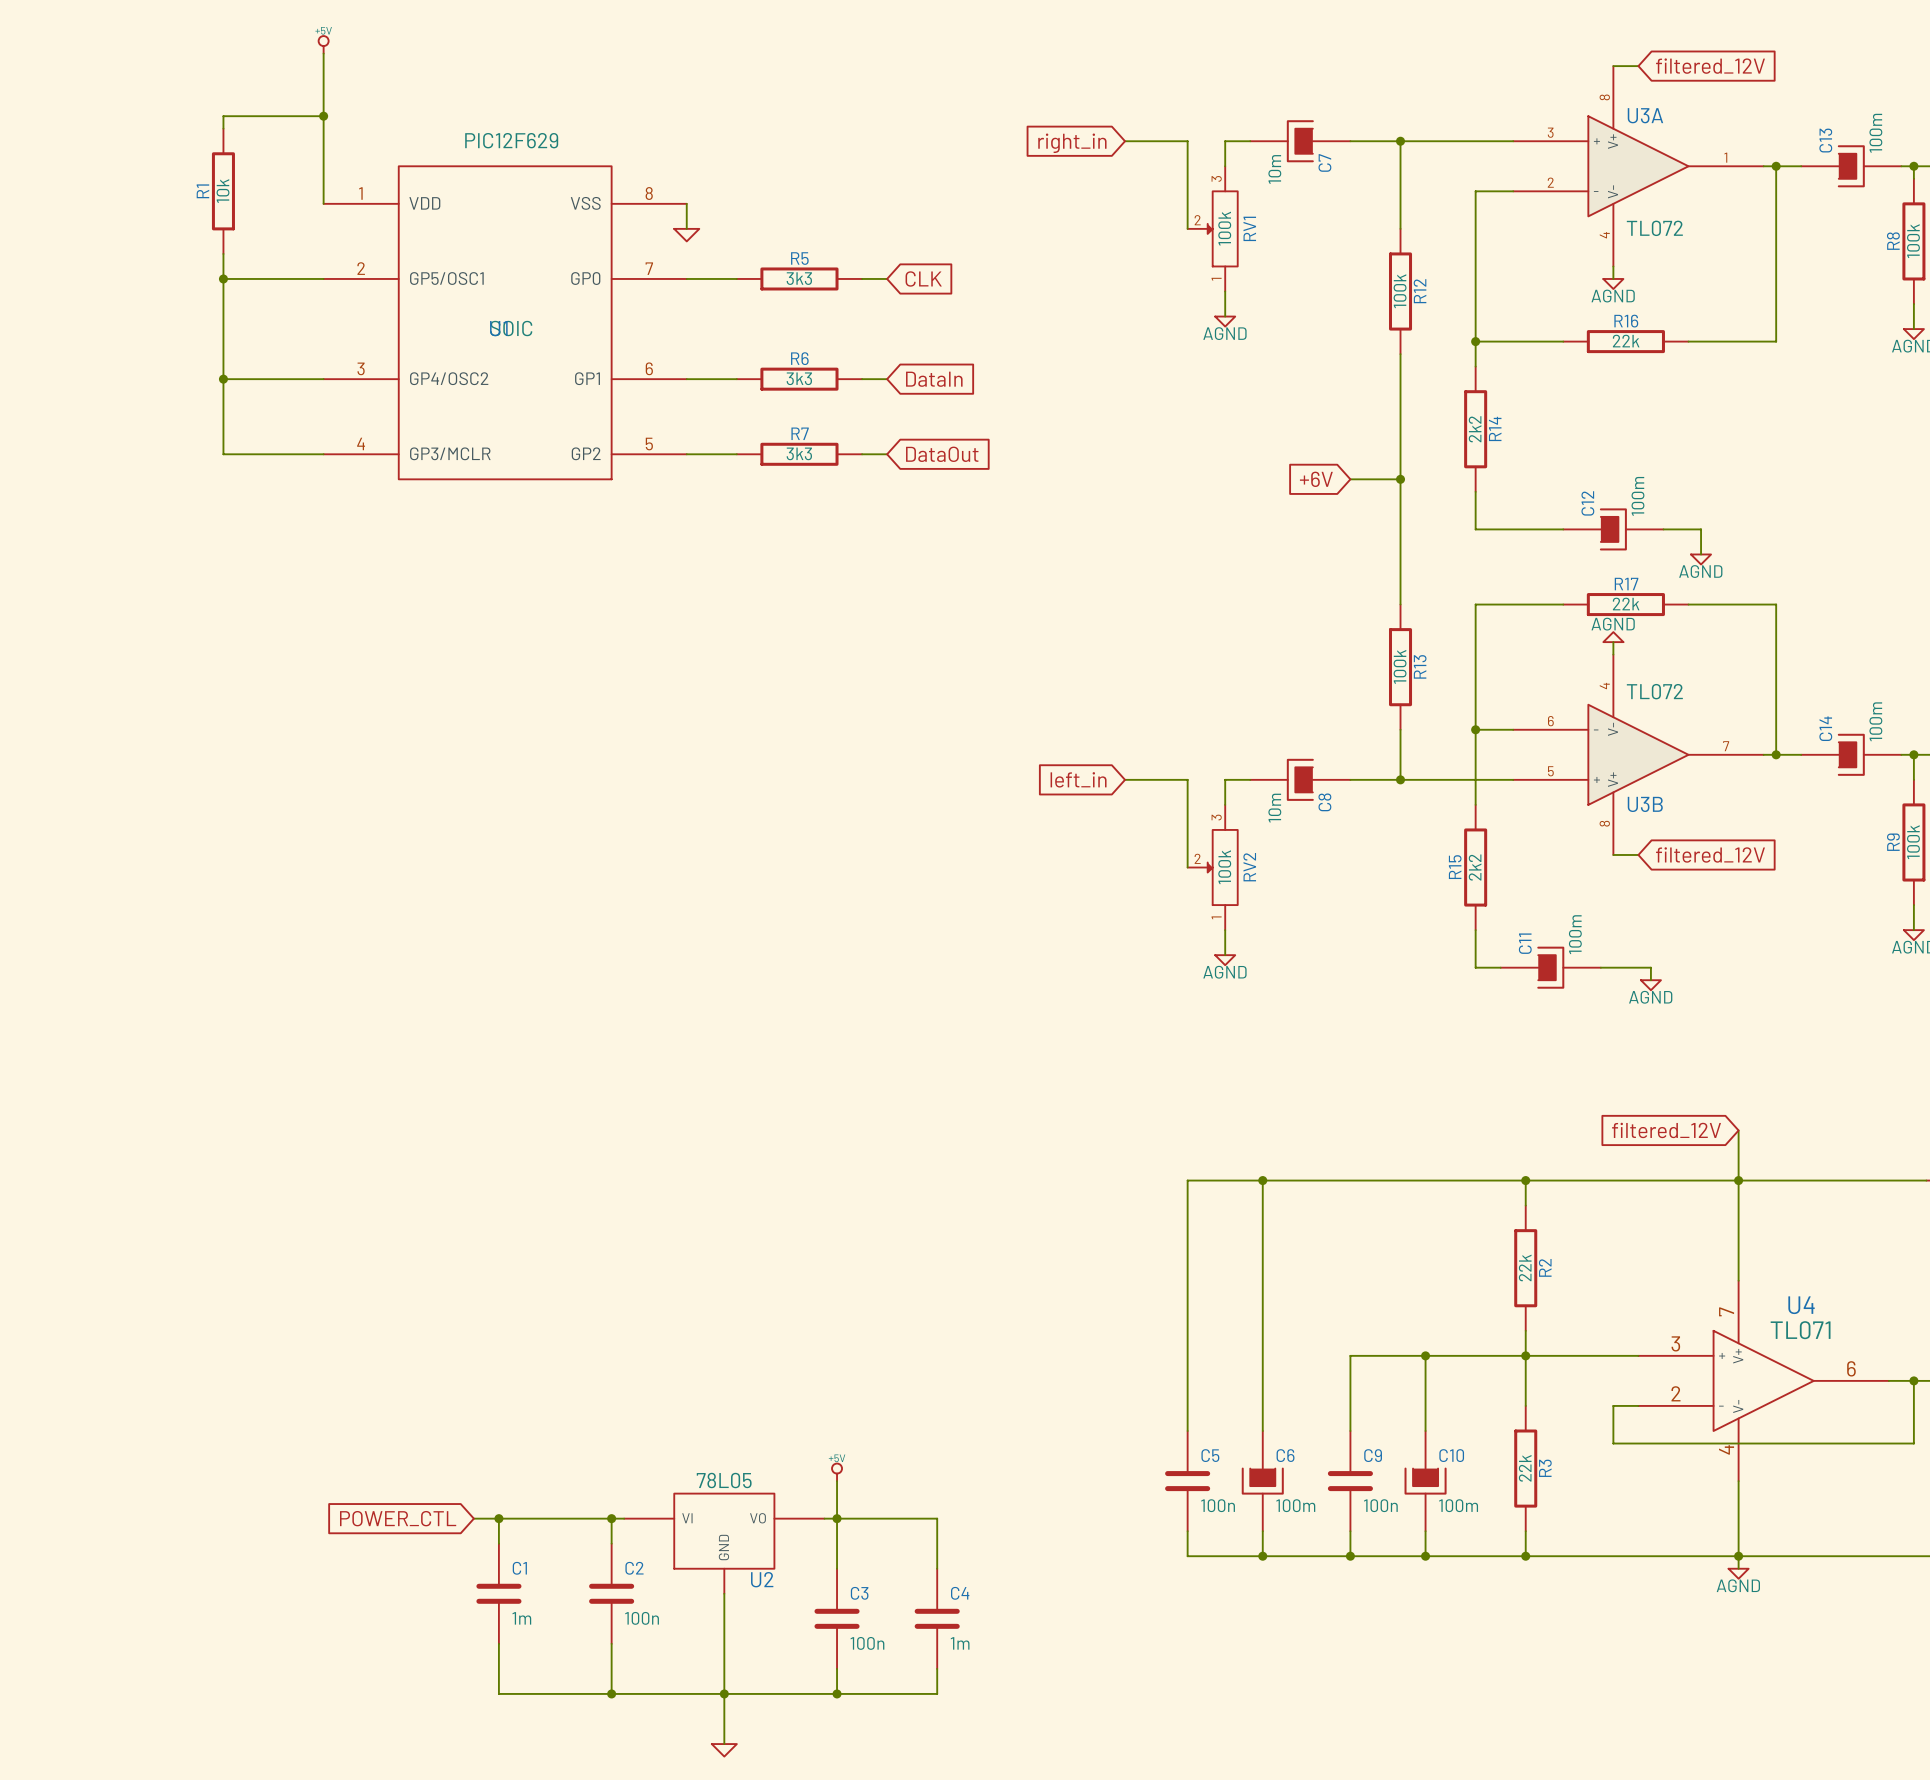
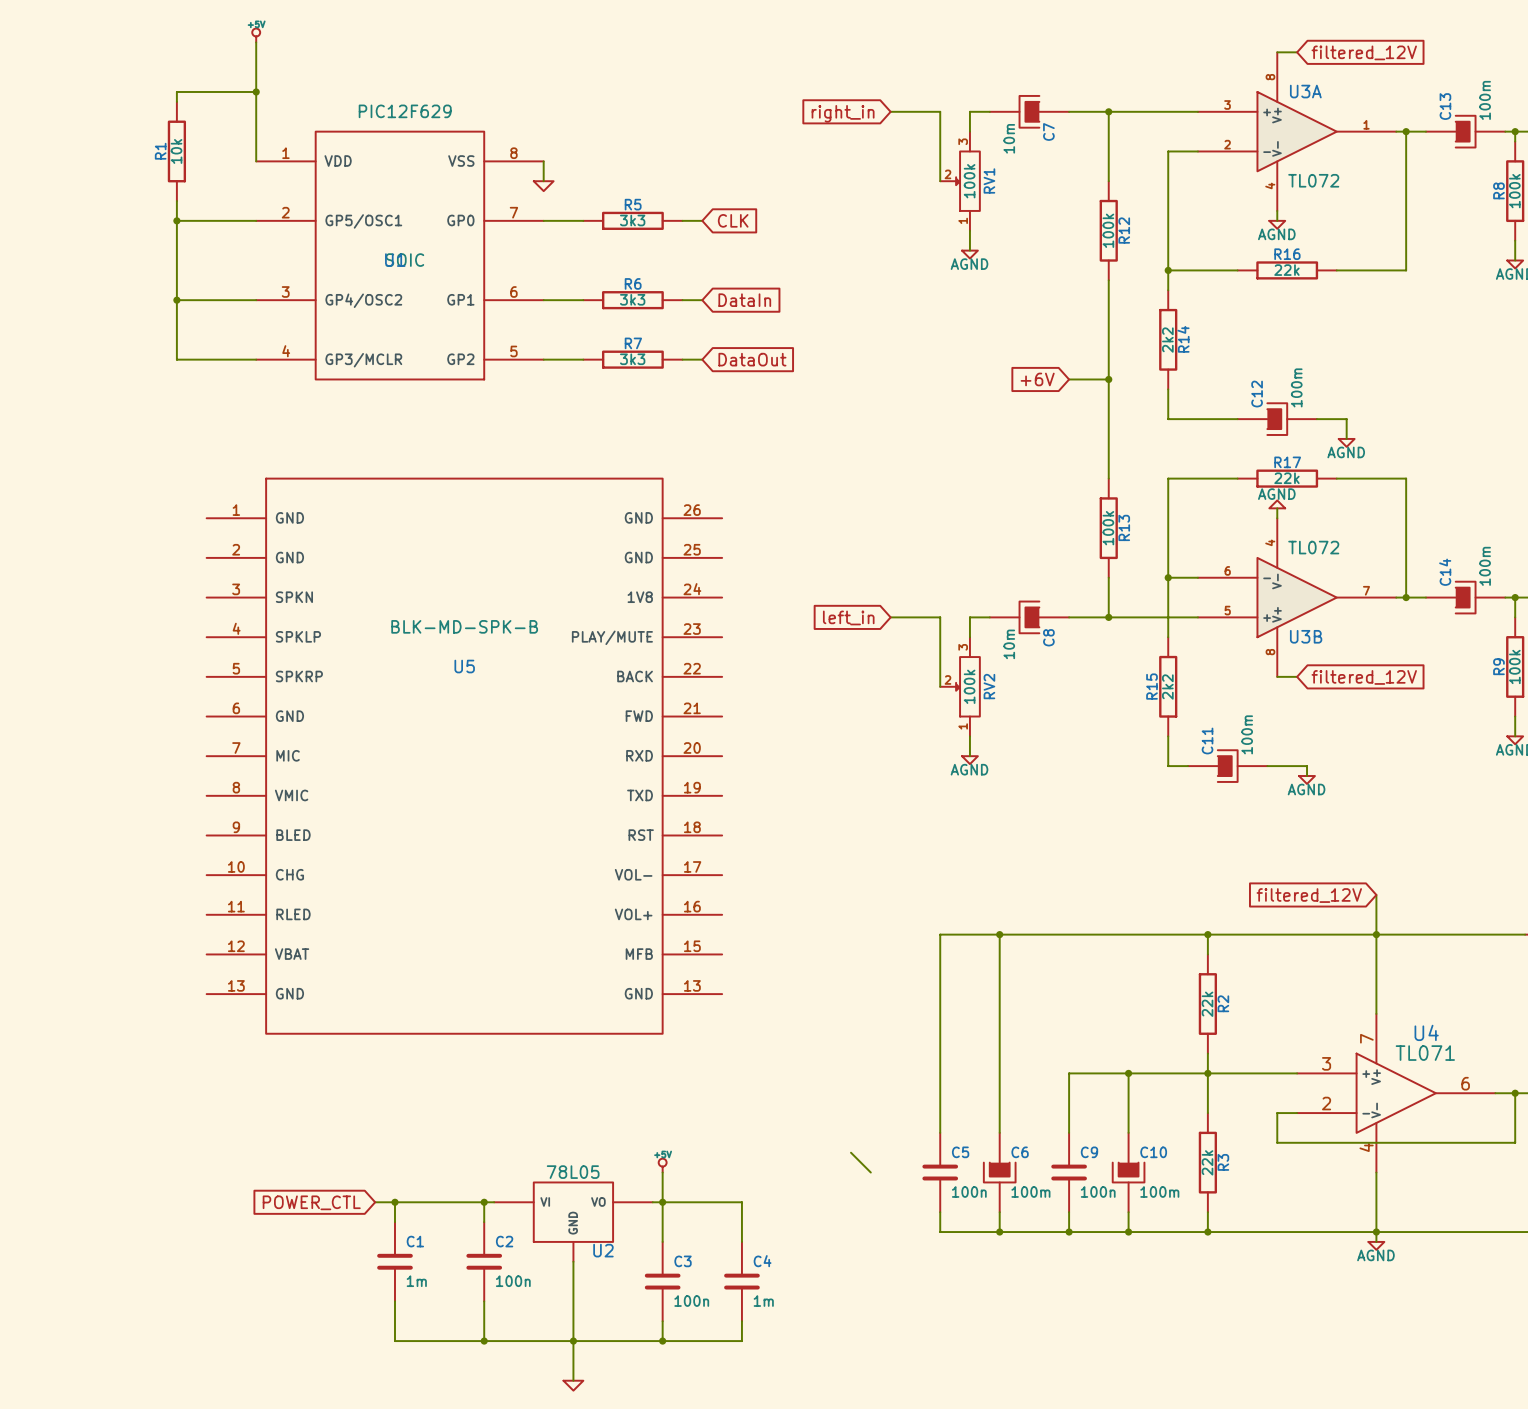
U5: none -> BLK-MD-SPK-B (464, 756)
wire: none -> (851, 1152) (870, 1172)

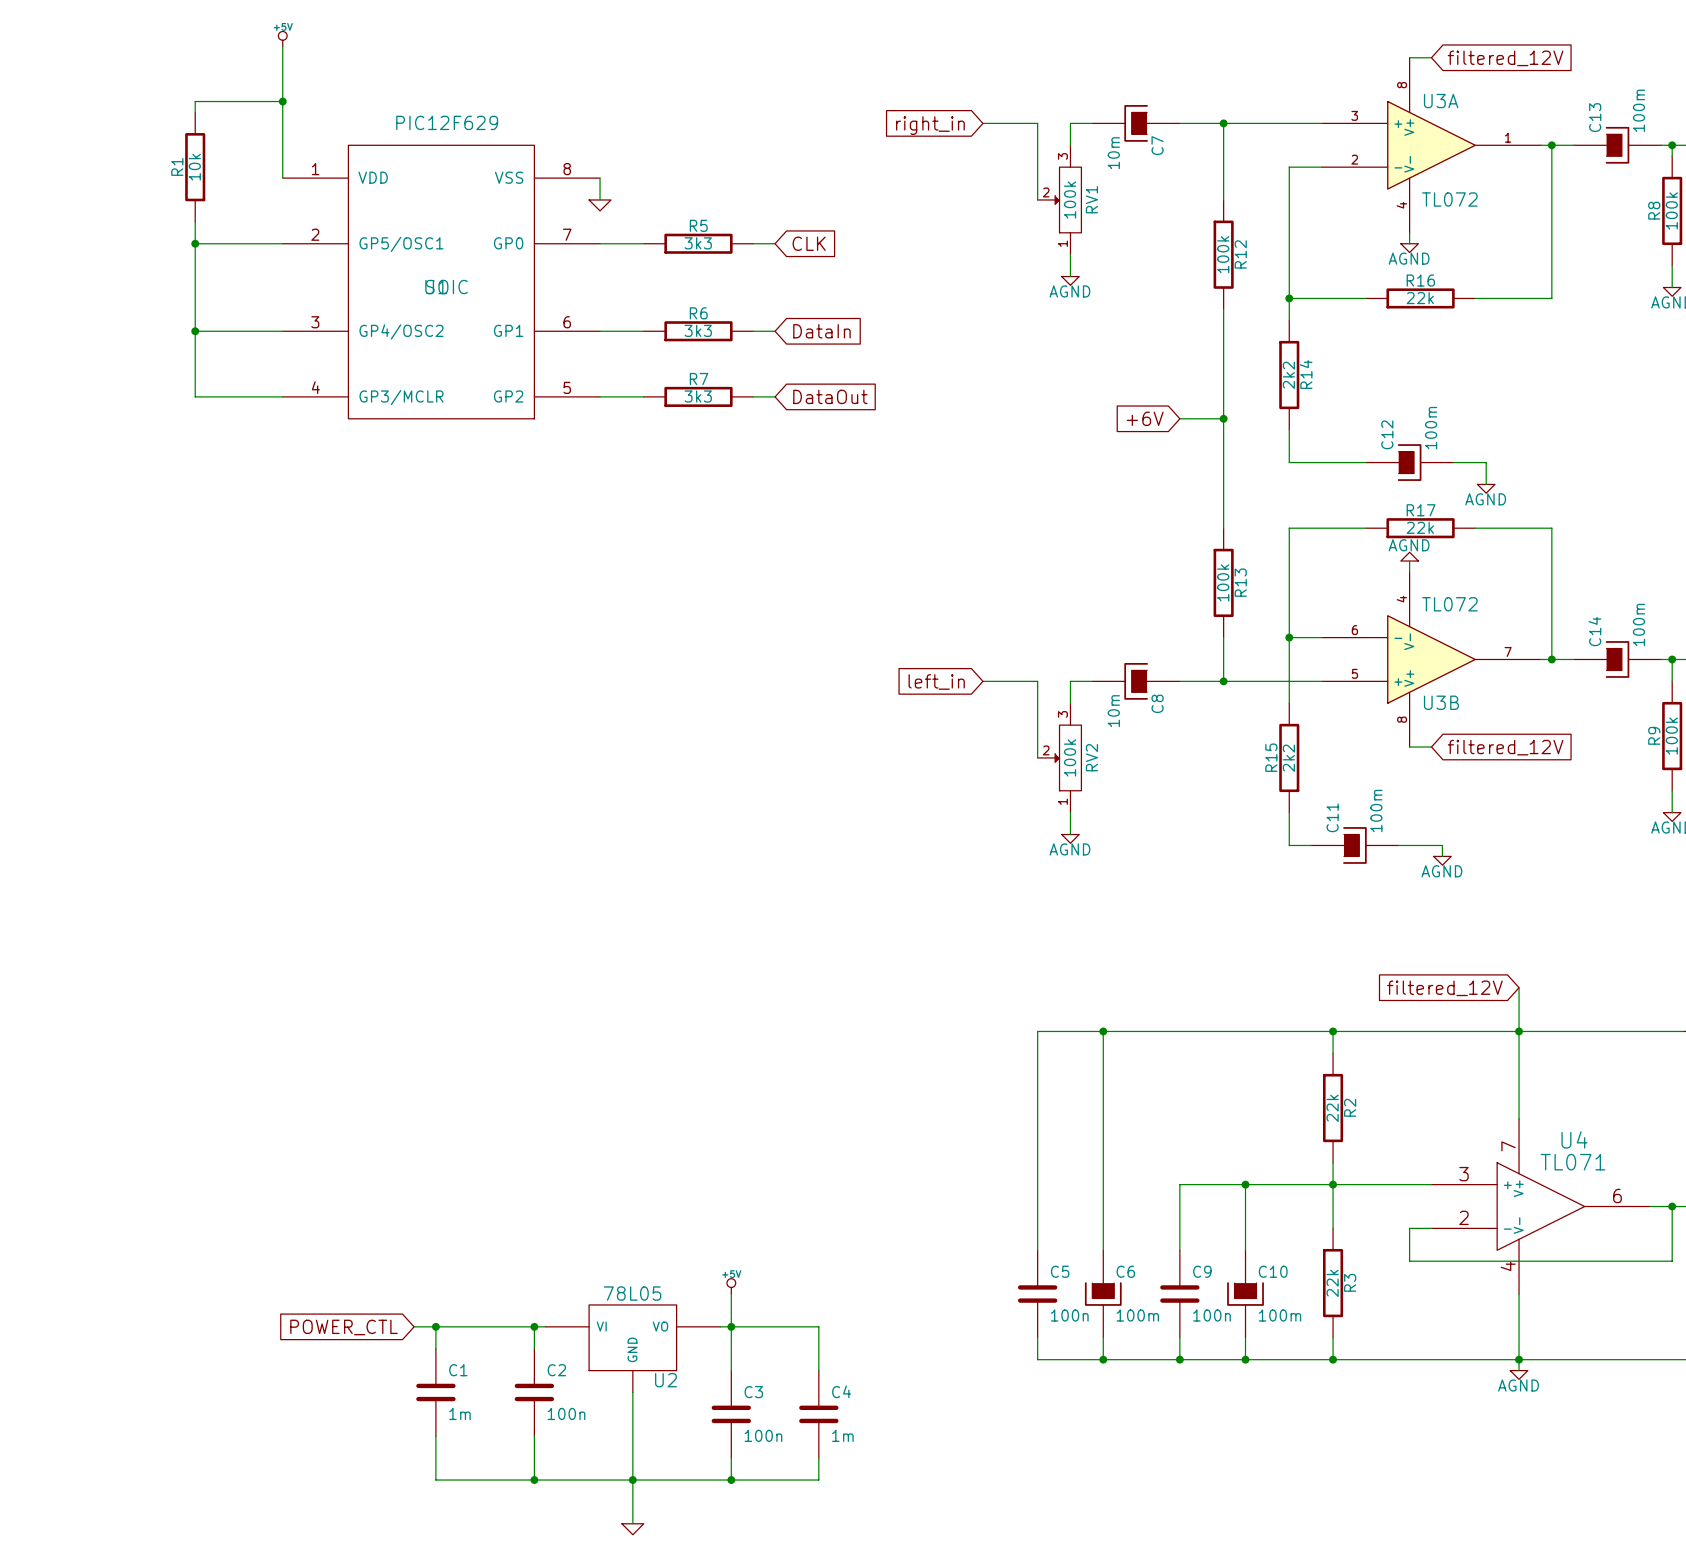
U5: BLK-MD-SPK-B (464, 756) -> none
wire: (851, 1152) (870, 1172) -> none

